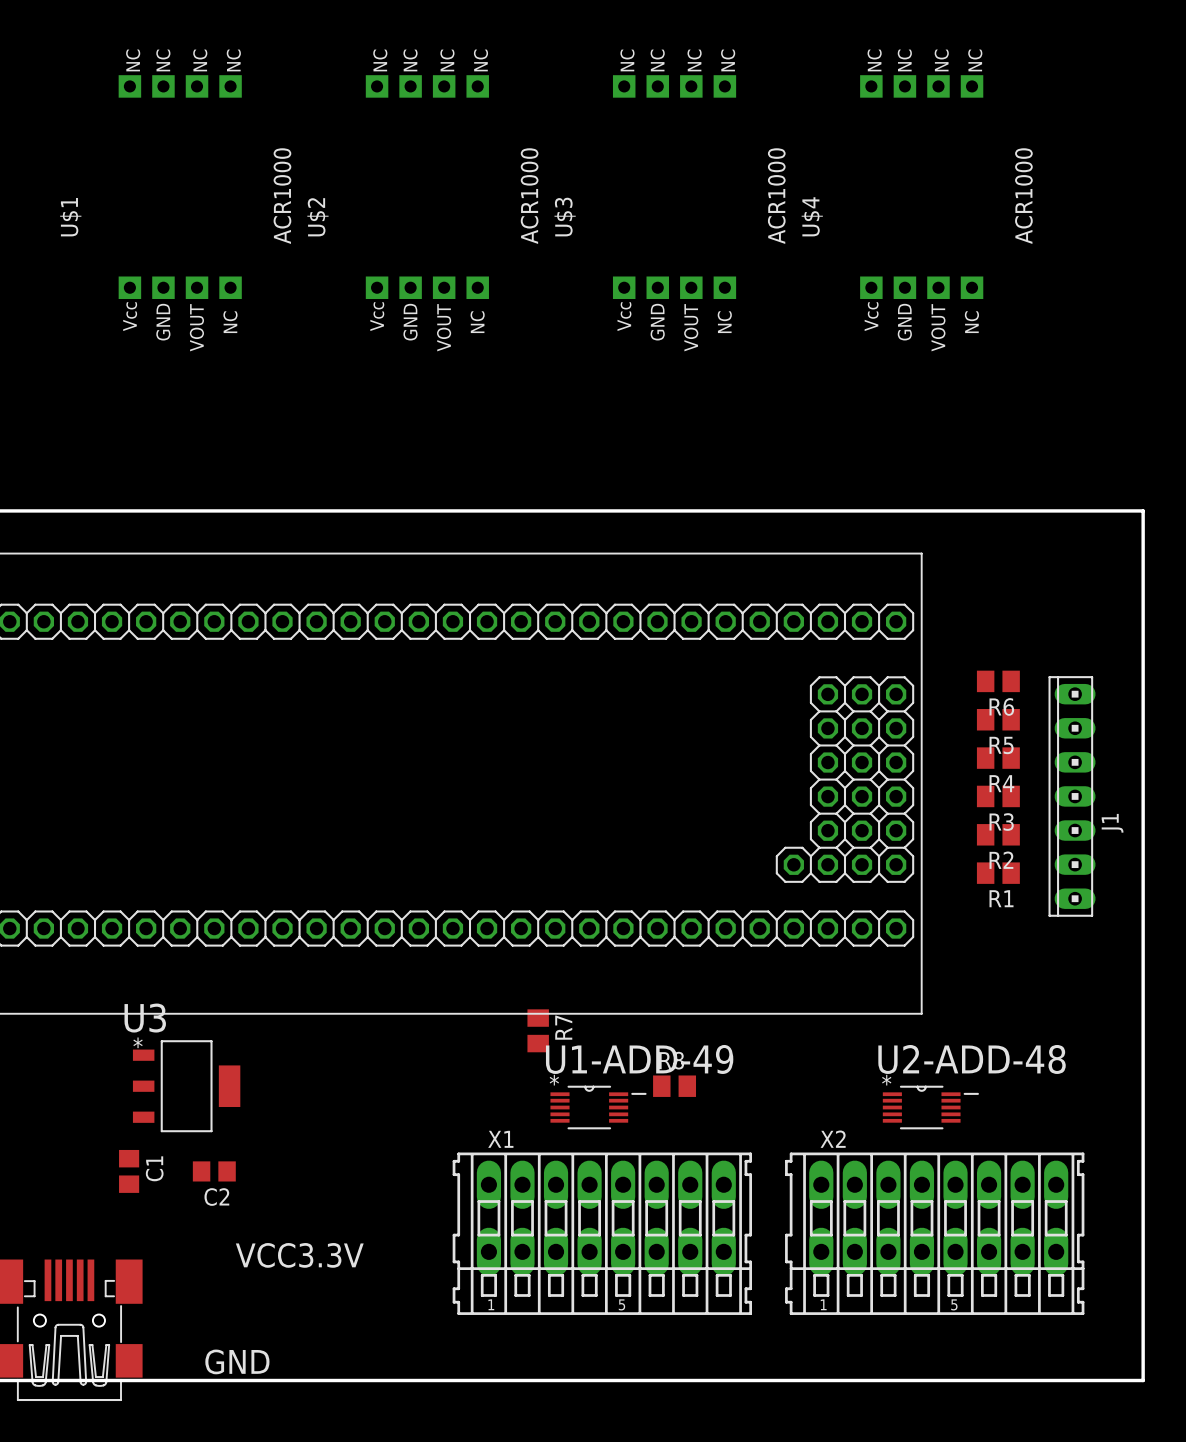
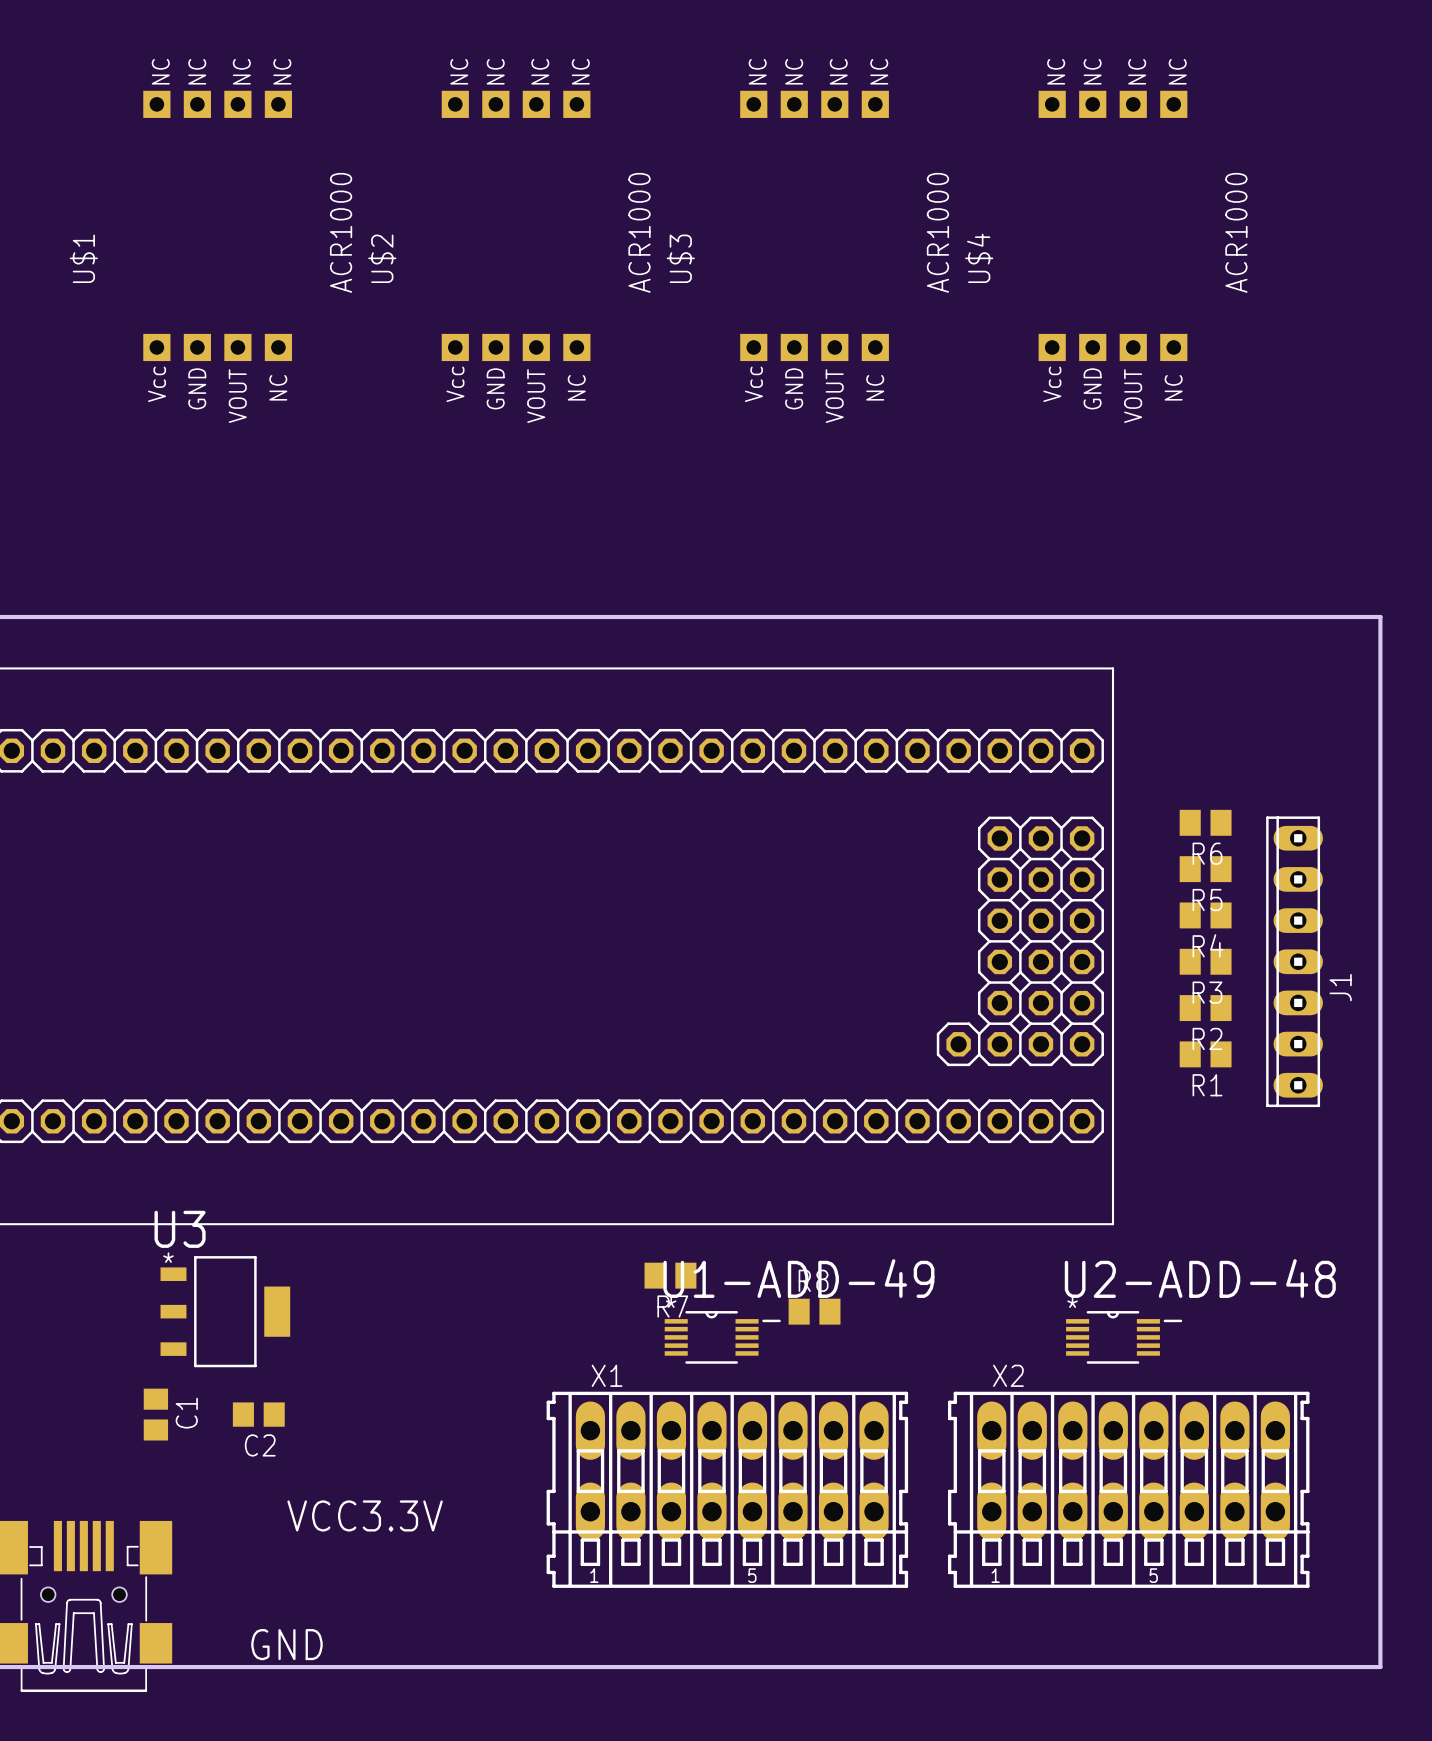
R7 rotation: 0° (538, 1030) -> 90° clockwise (670, 1275)
R7 position: (538, 1030) -> (670, 1275)

